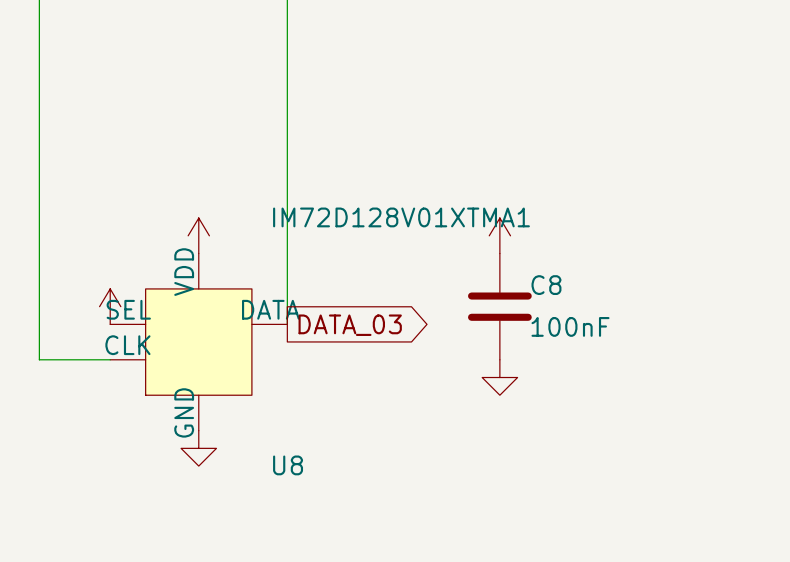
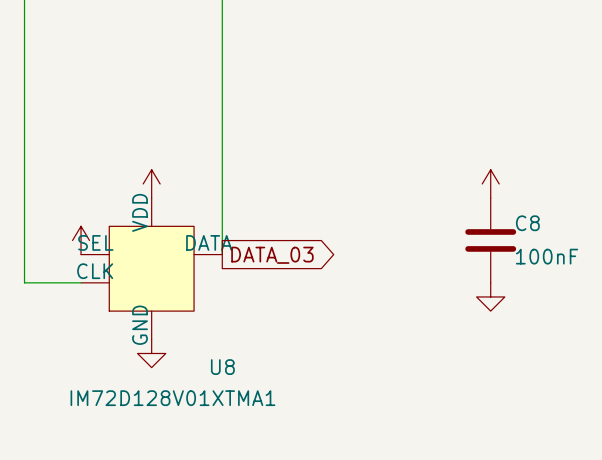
U8 value position: IM72D128V01XTMA1 (401, 217) -> IM72D128V01XTMA1 (172, 398)
power symbol position: (499, 235) -> (490, 183)
C8 position: (499, 306) -> (490, 240)
power symbol position: (499, 377) -> (490, 296)

